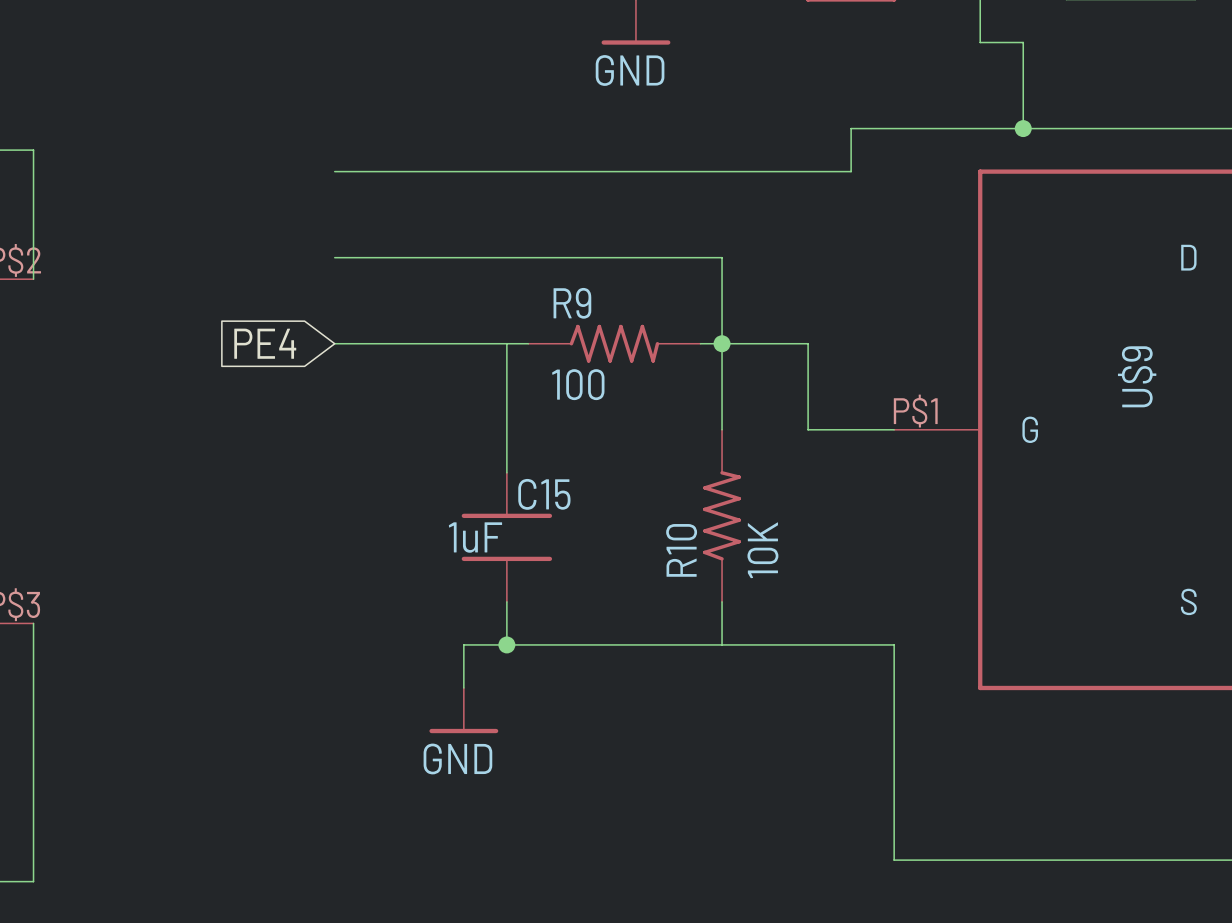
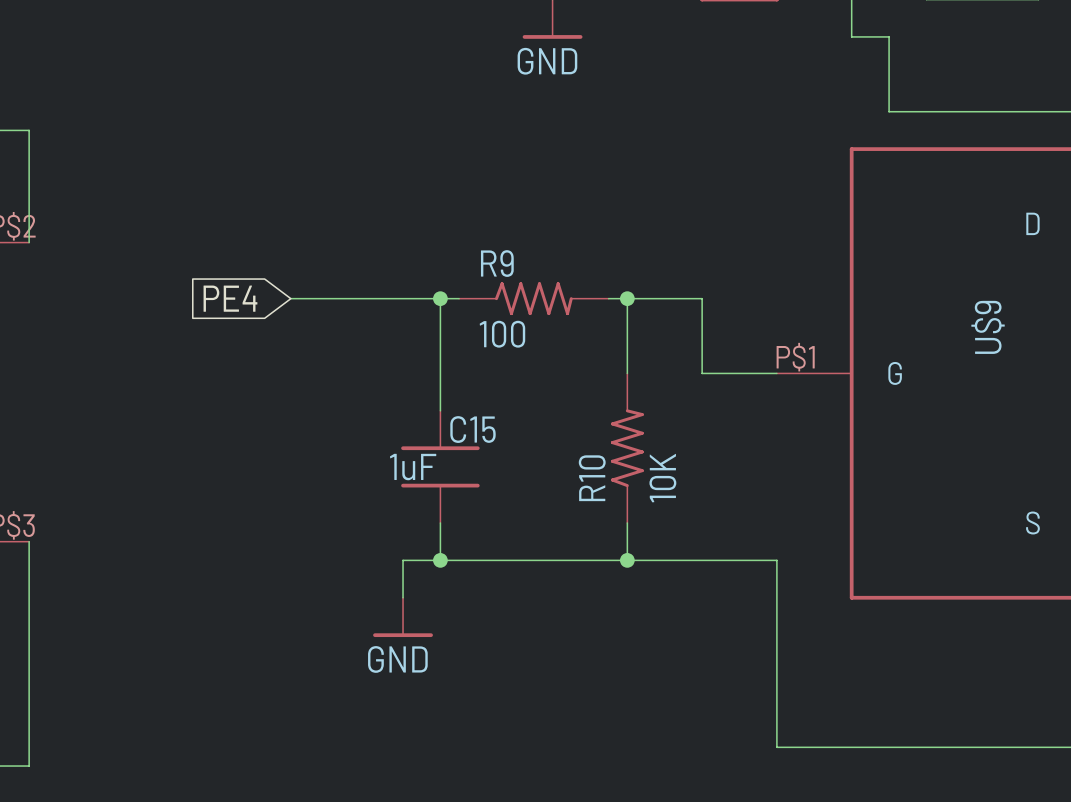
wire: (1023, 128) (851, 128) (851, 171) (334, 171) -> none
junction: (1023, 128) -> none
wire: (334, 257) (722, 257) (722, 343) -> none
junction: none -> (440, 298)
junction: none -> (627, 560)

